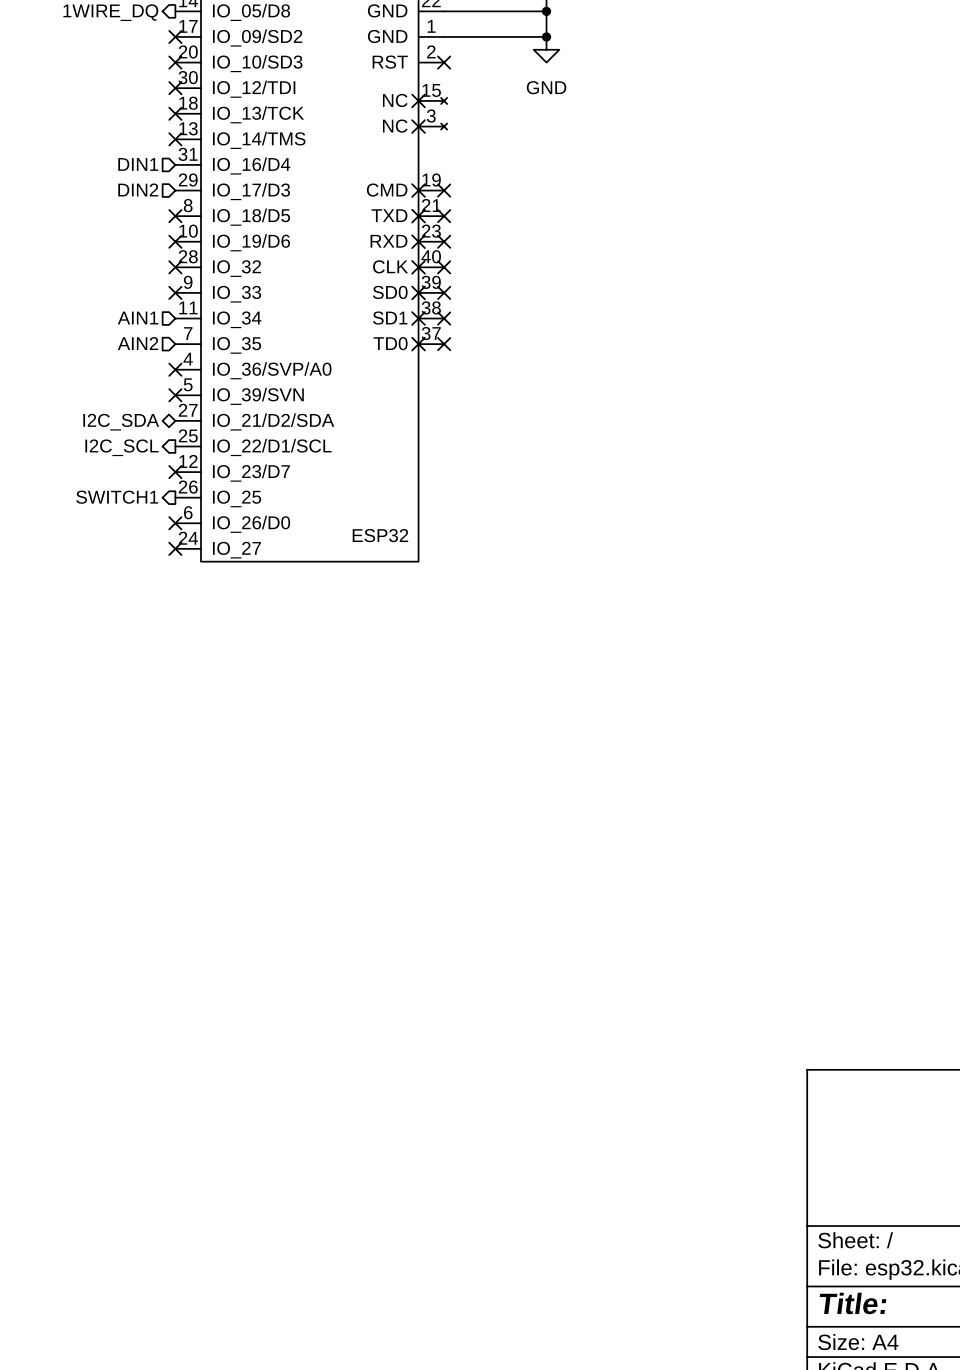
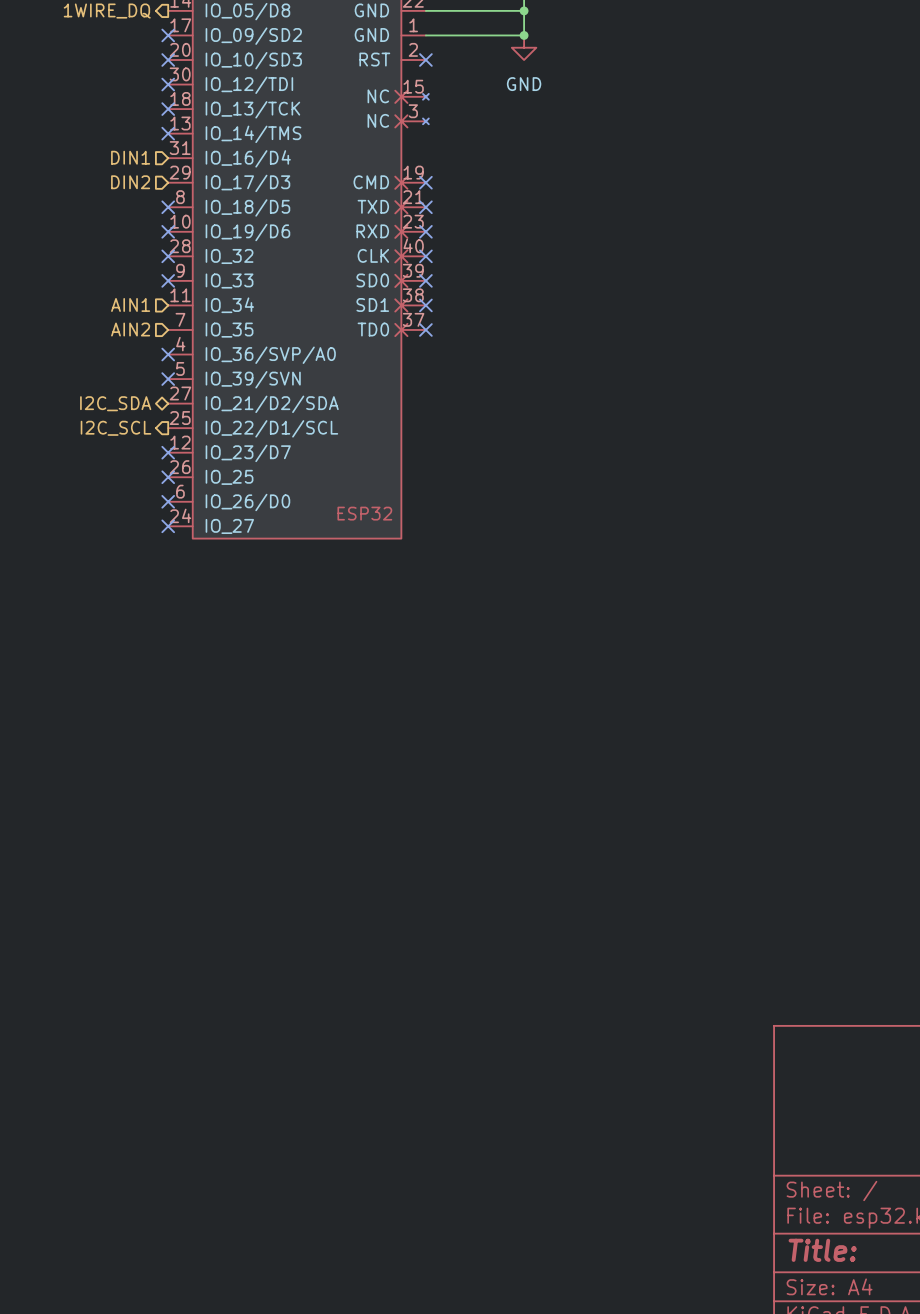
hierarchical label: SWITCH1 (117, 497) -> none
no-connect mark: none -> (168, 477)

